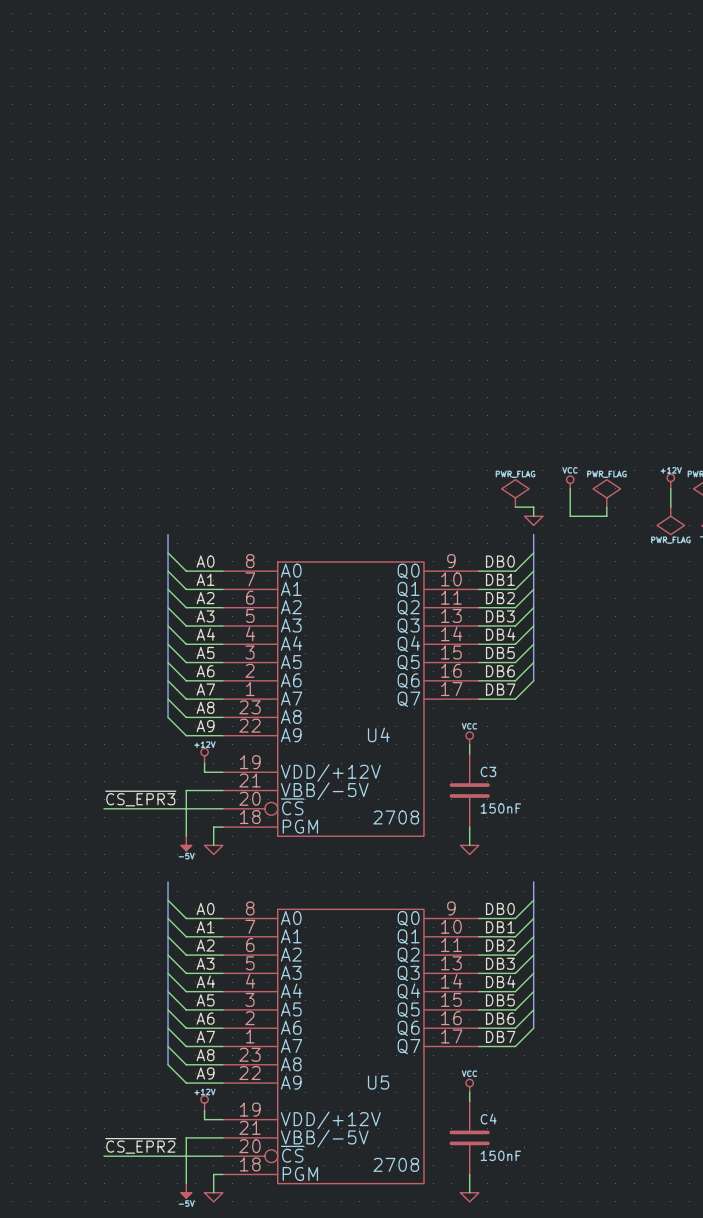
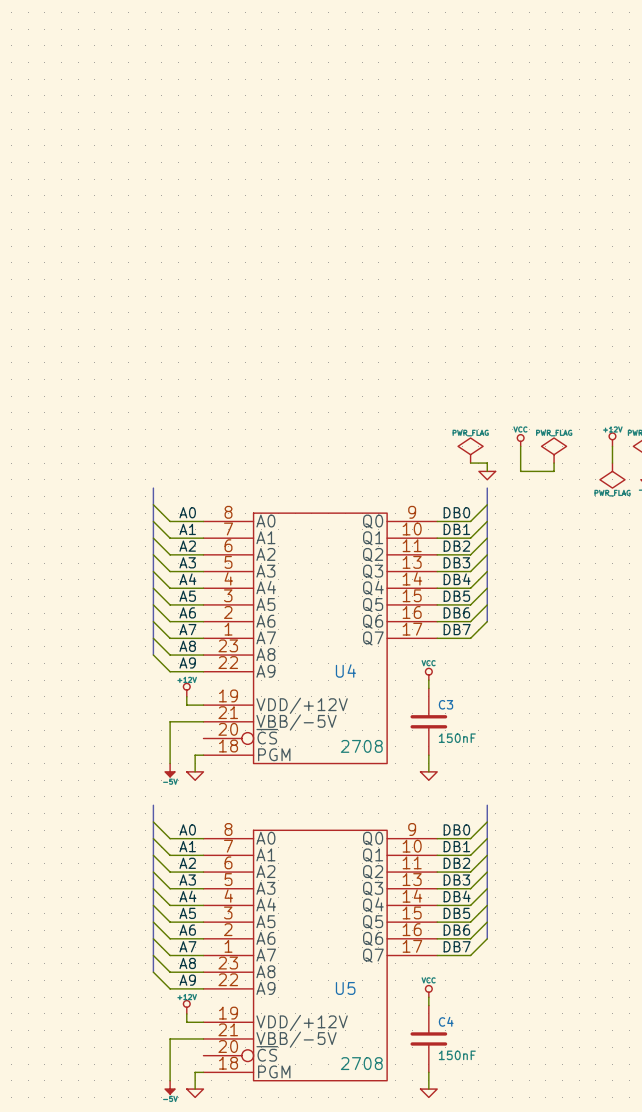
label: ~{CS_EPR3} (140, 798) -> none
wire: (104, 808) (222, 808) -> none
label: ~{CS_EPR2} (140, 1145) -> none
wire: (104, 1156) (222, 1156) -> none

